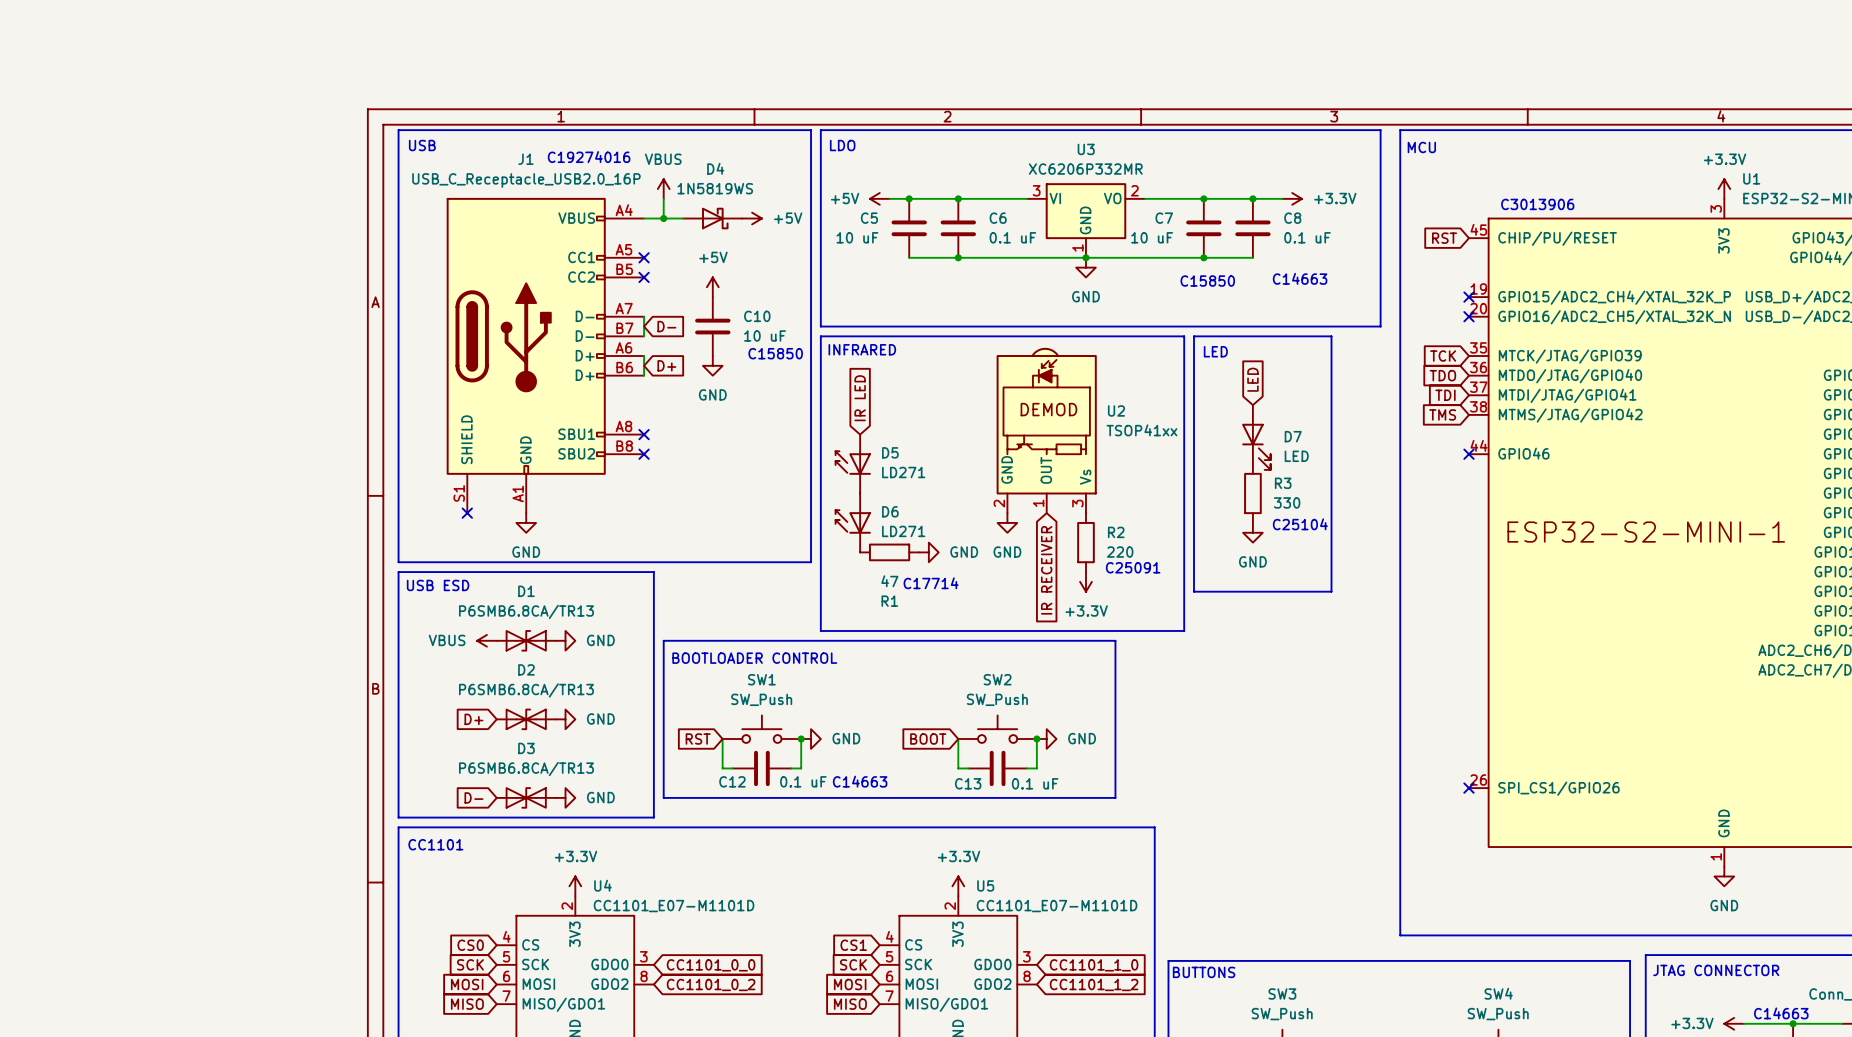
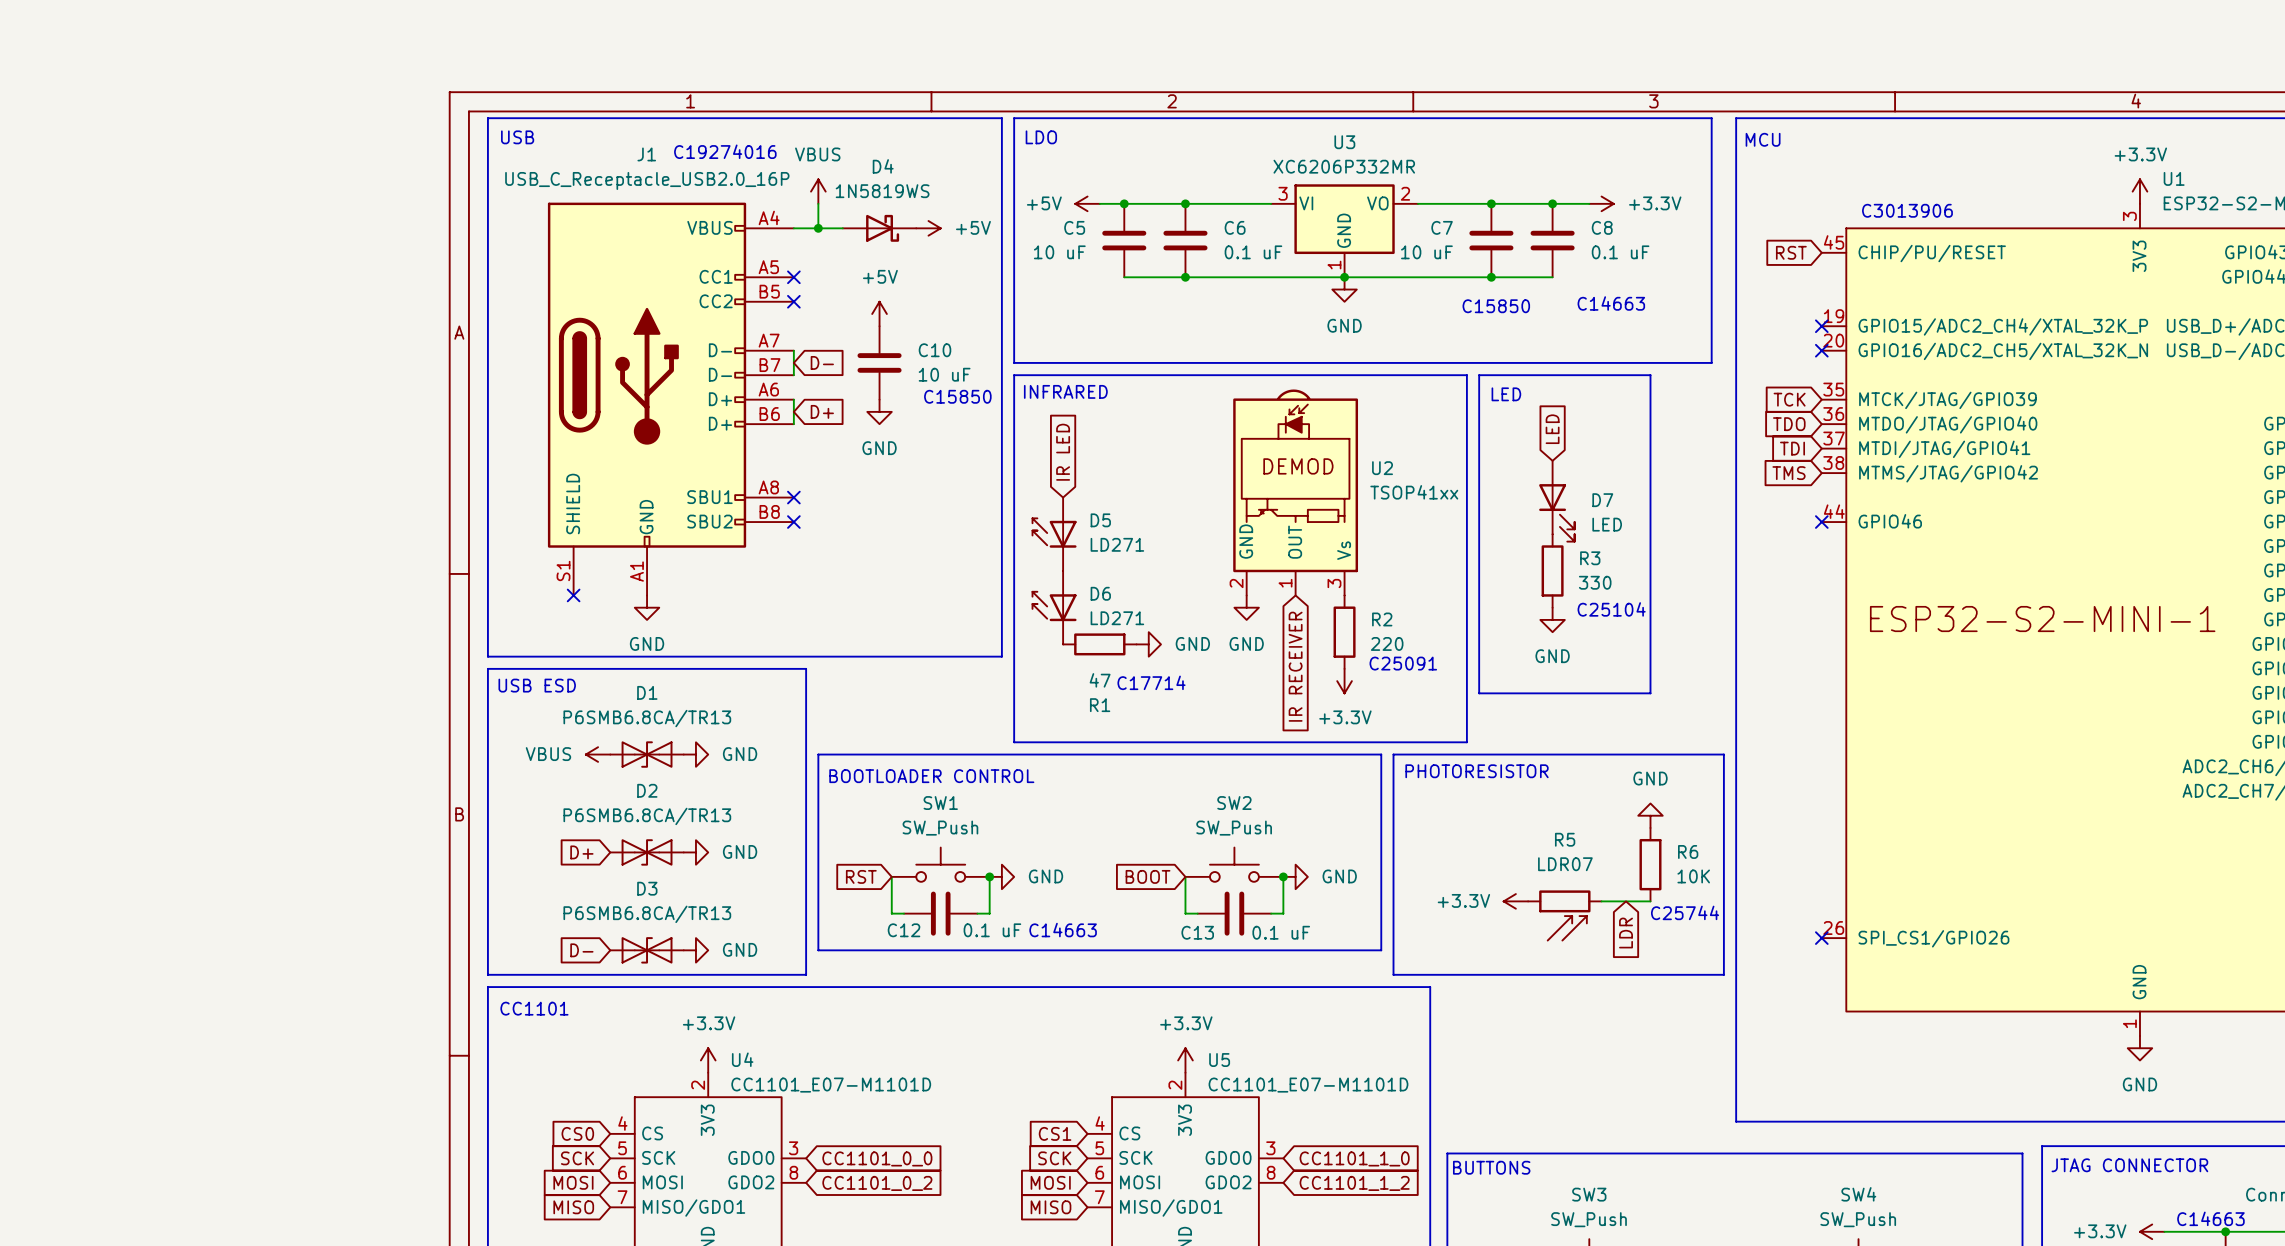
line: none -> (1393, 754) (1723, 754) (1723, 974) (1393, 974) (1393, 754)
text: none -> PHOTORESISTOR (1477, 771)
power symbol: none -> GND (1650, 815)
R6: none -> 10K (1650, 864)
power symbol: none -> +3.3V (1515, 901)
wire: none -> (1601, 901) (1650, 901)
text: none -> C25744 (1685, 912)
R5: none -> LDR07 (1564, 915)
global label: none -> LDR (1626, 933)

